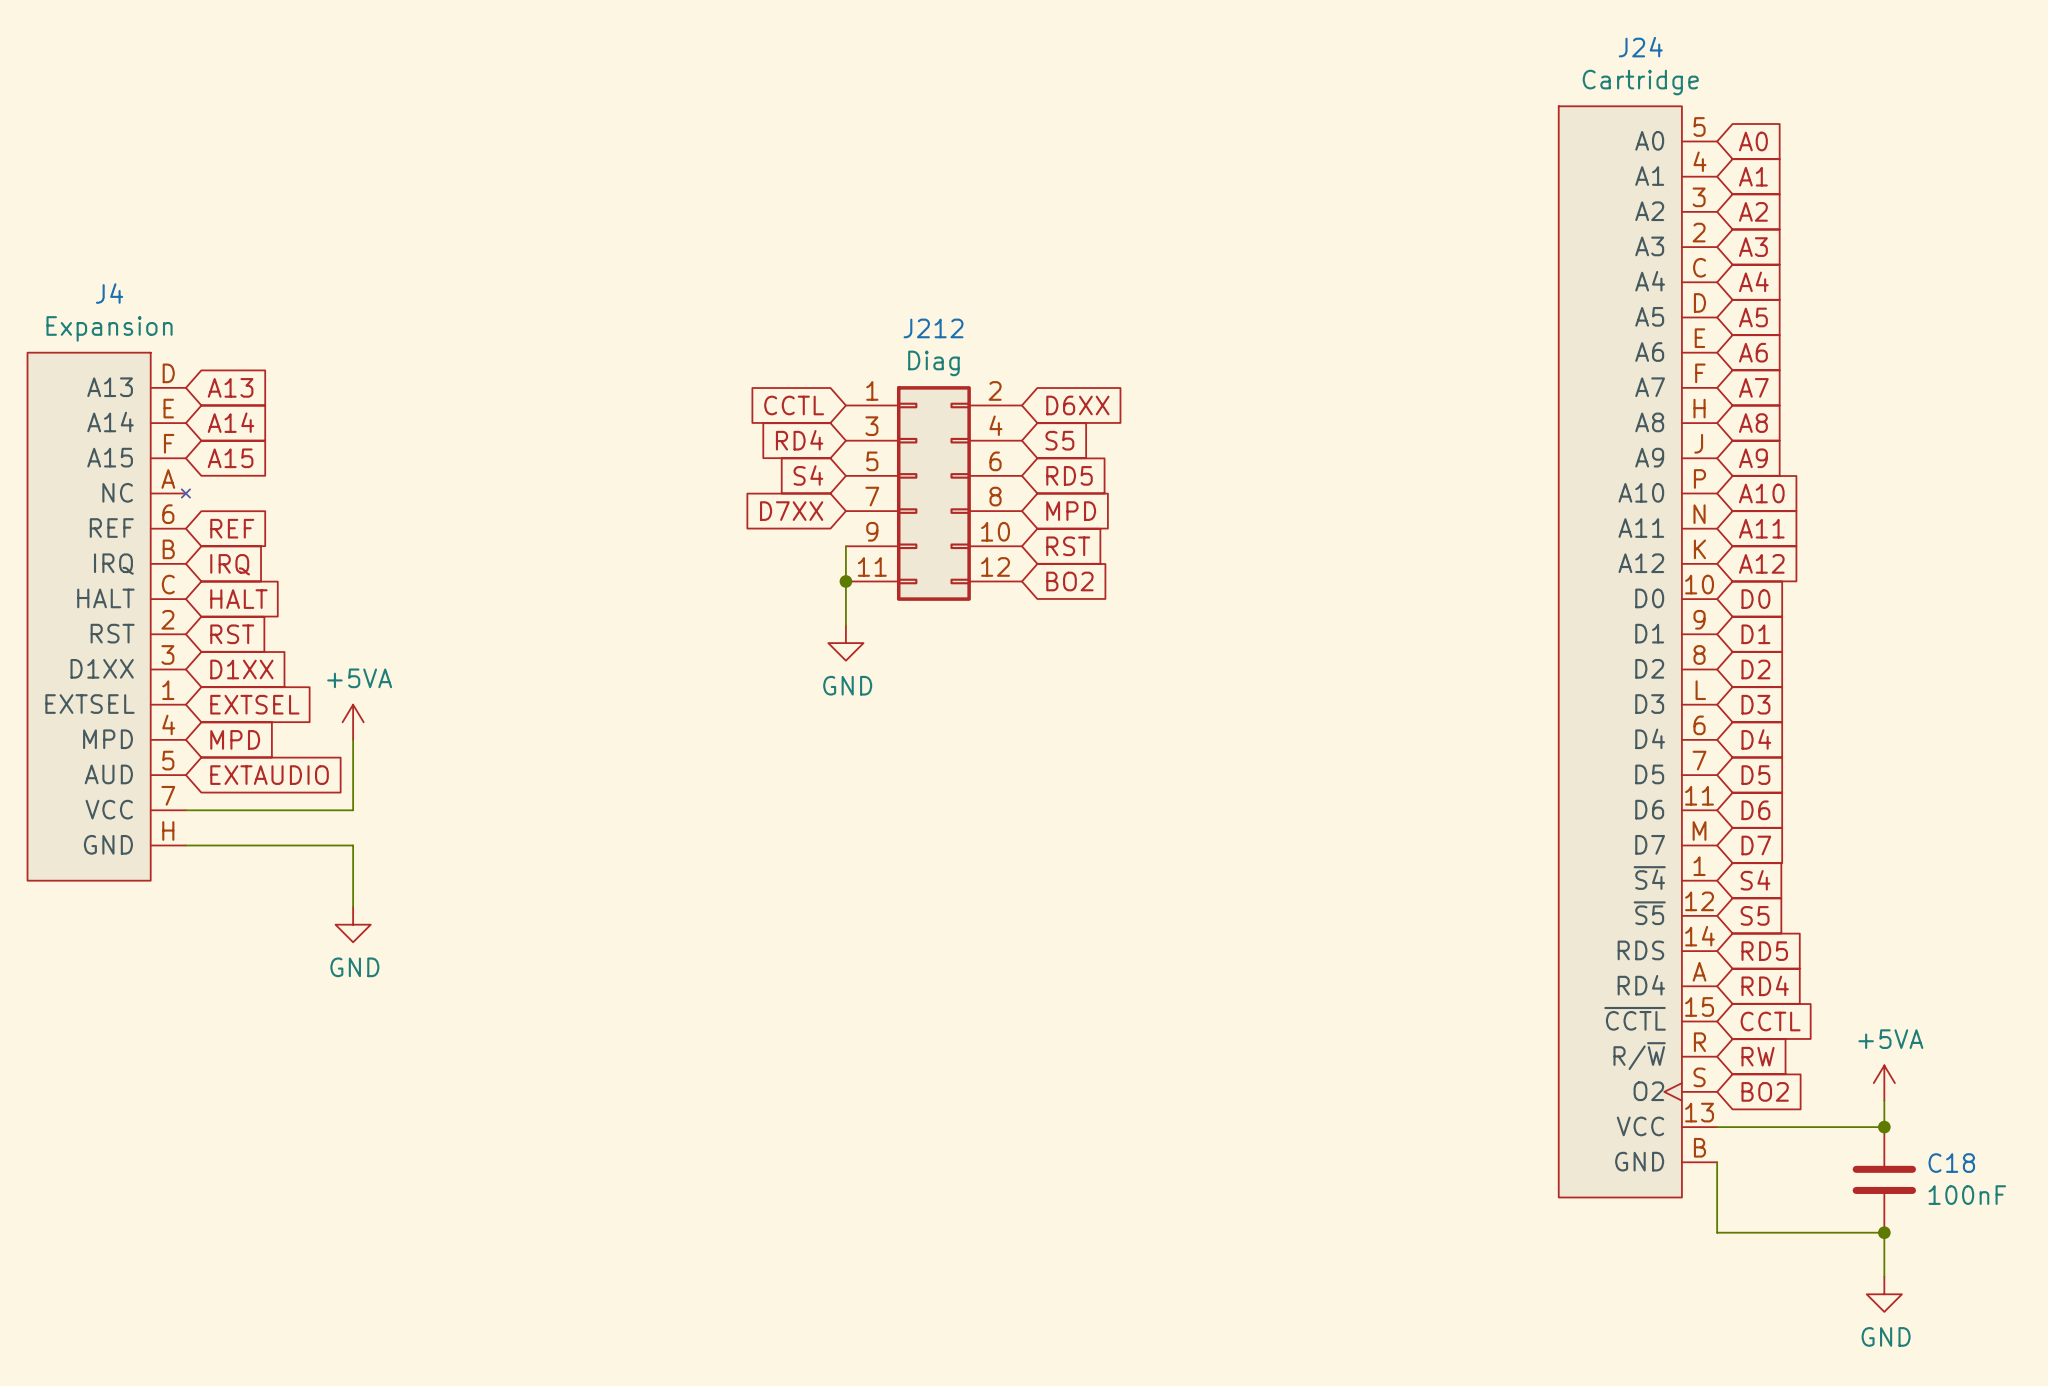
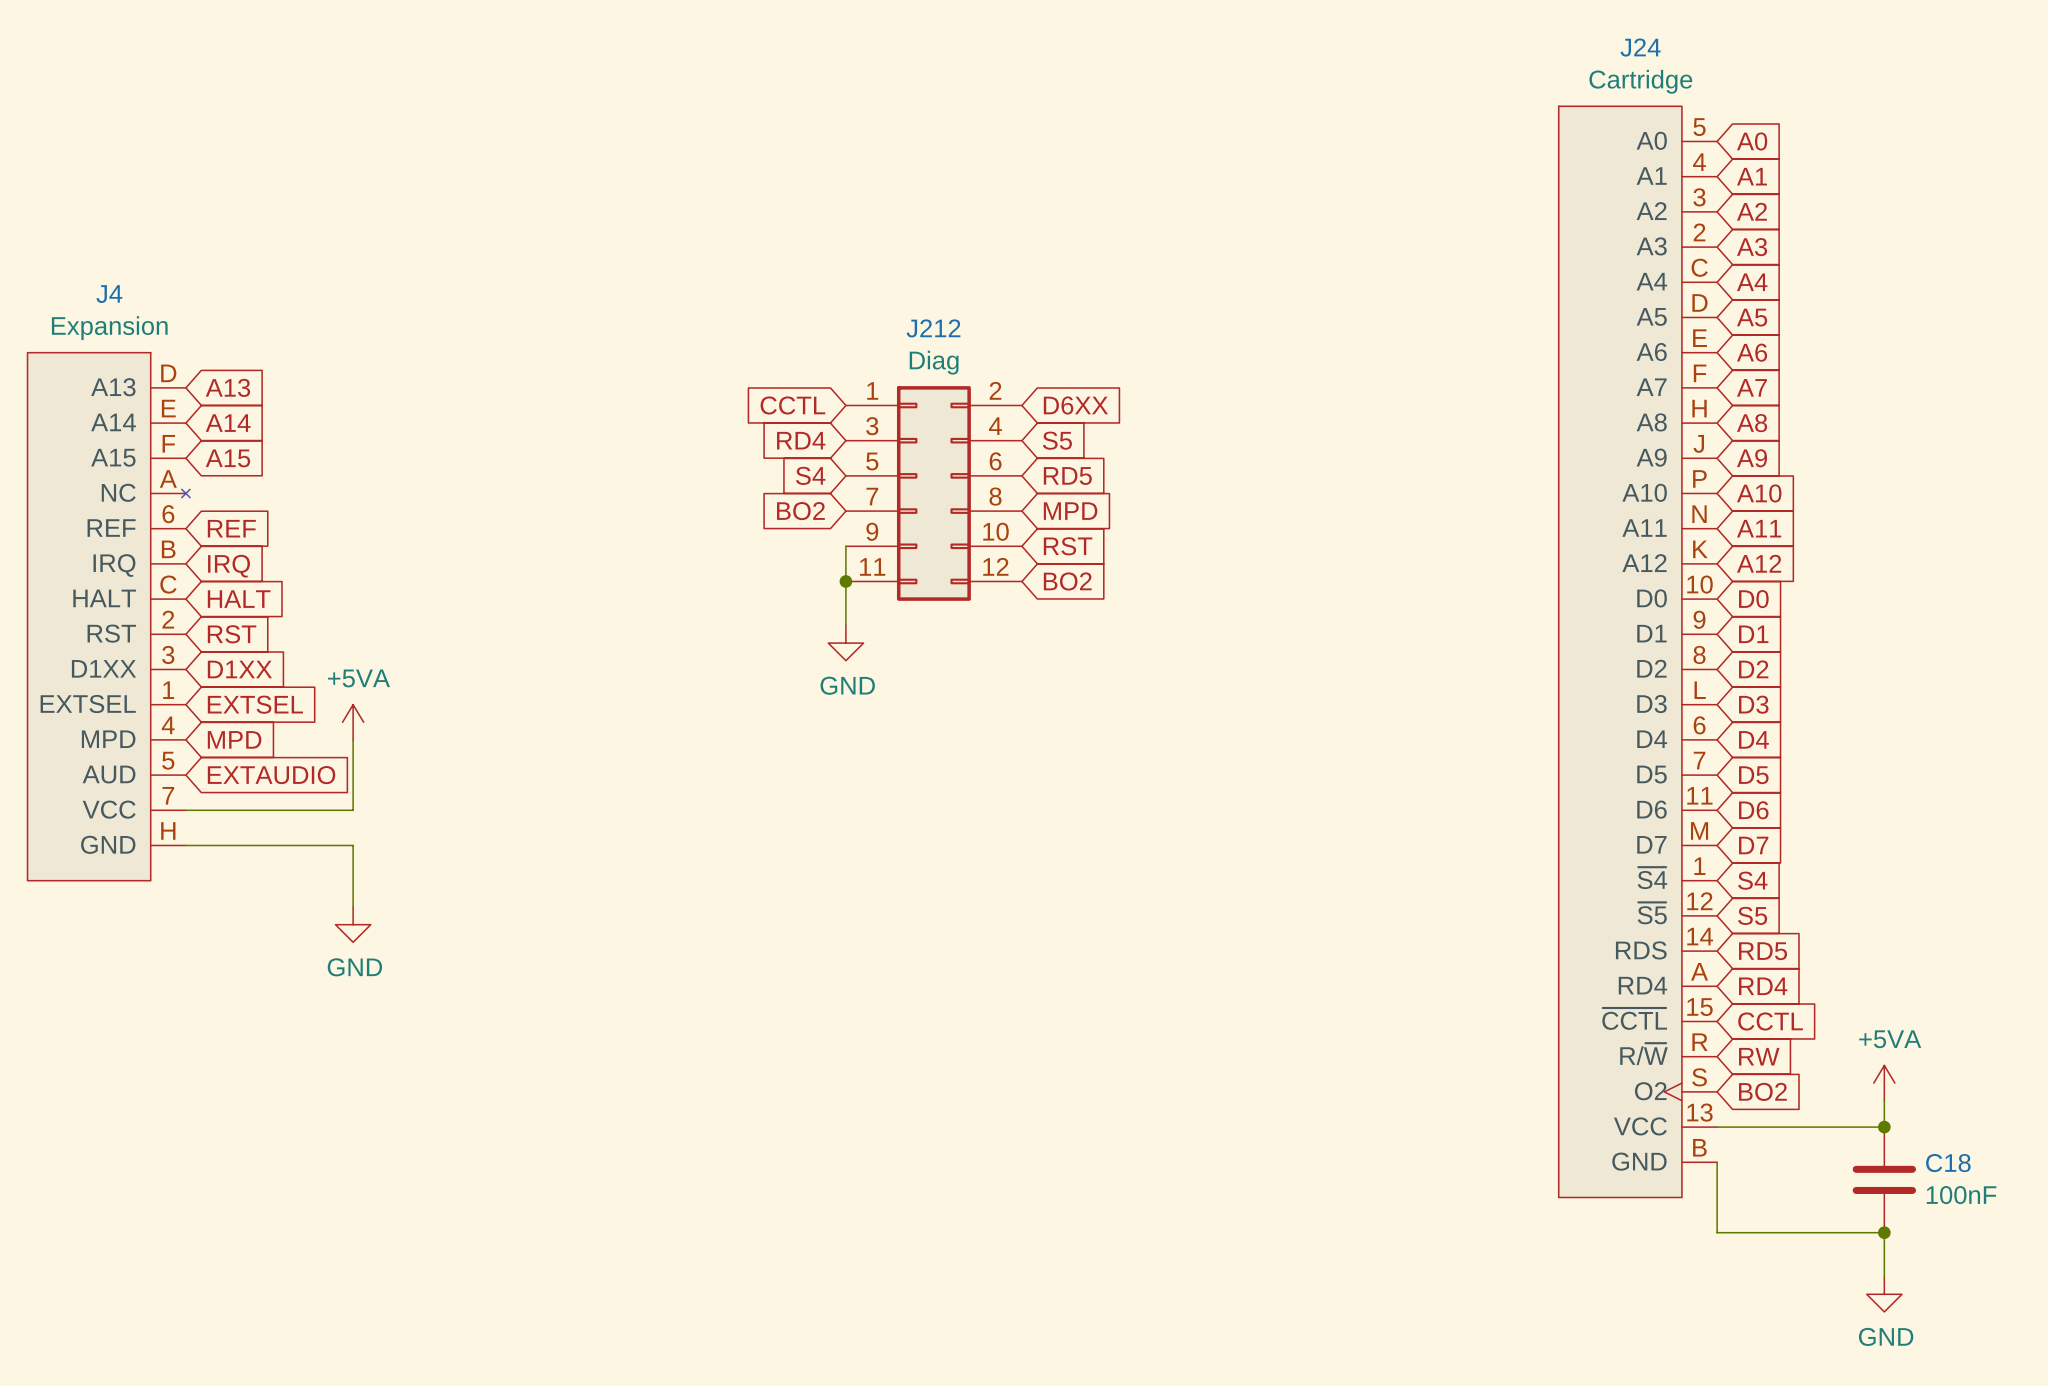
global label: D7XX (791, 511) -> BO2 (800, 511)

